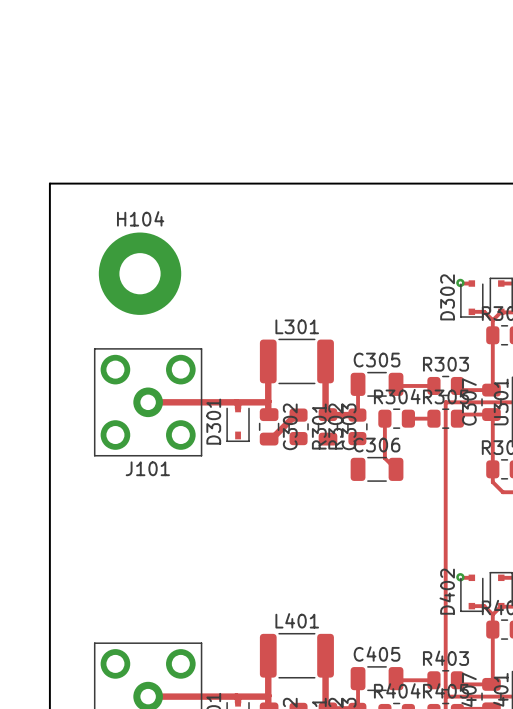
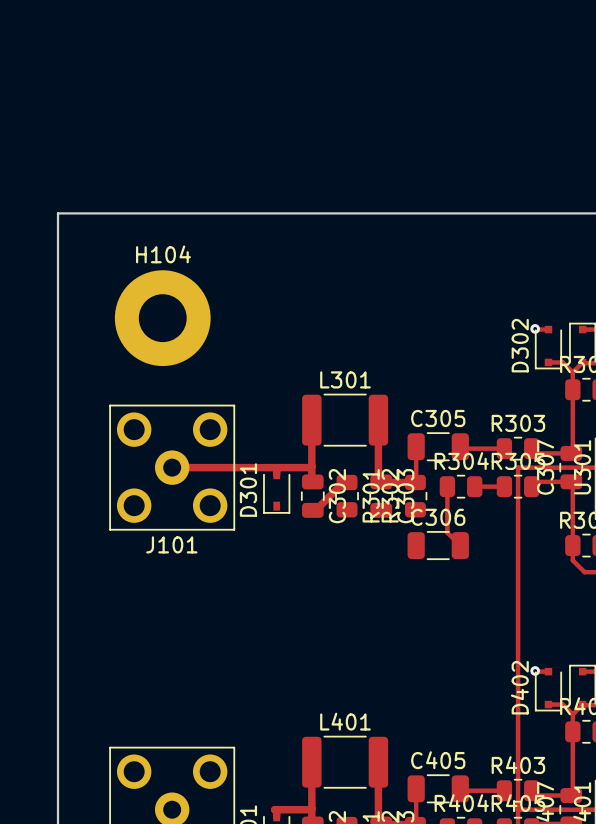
track: (148, 696) (236, 696) -> none

